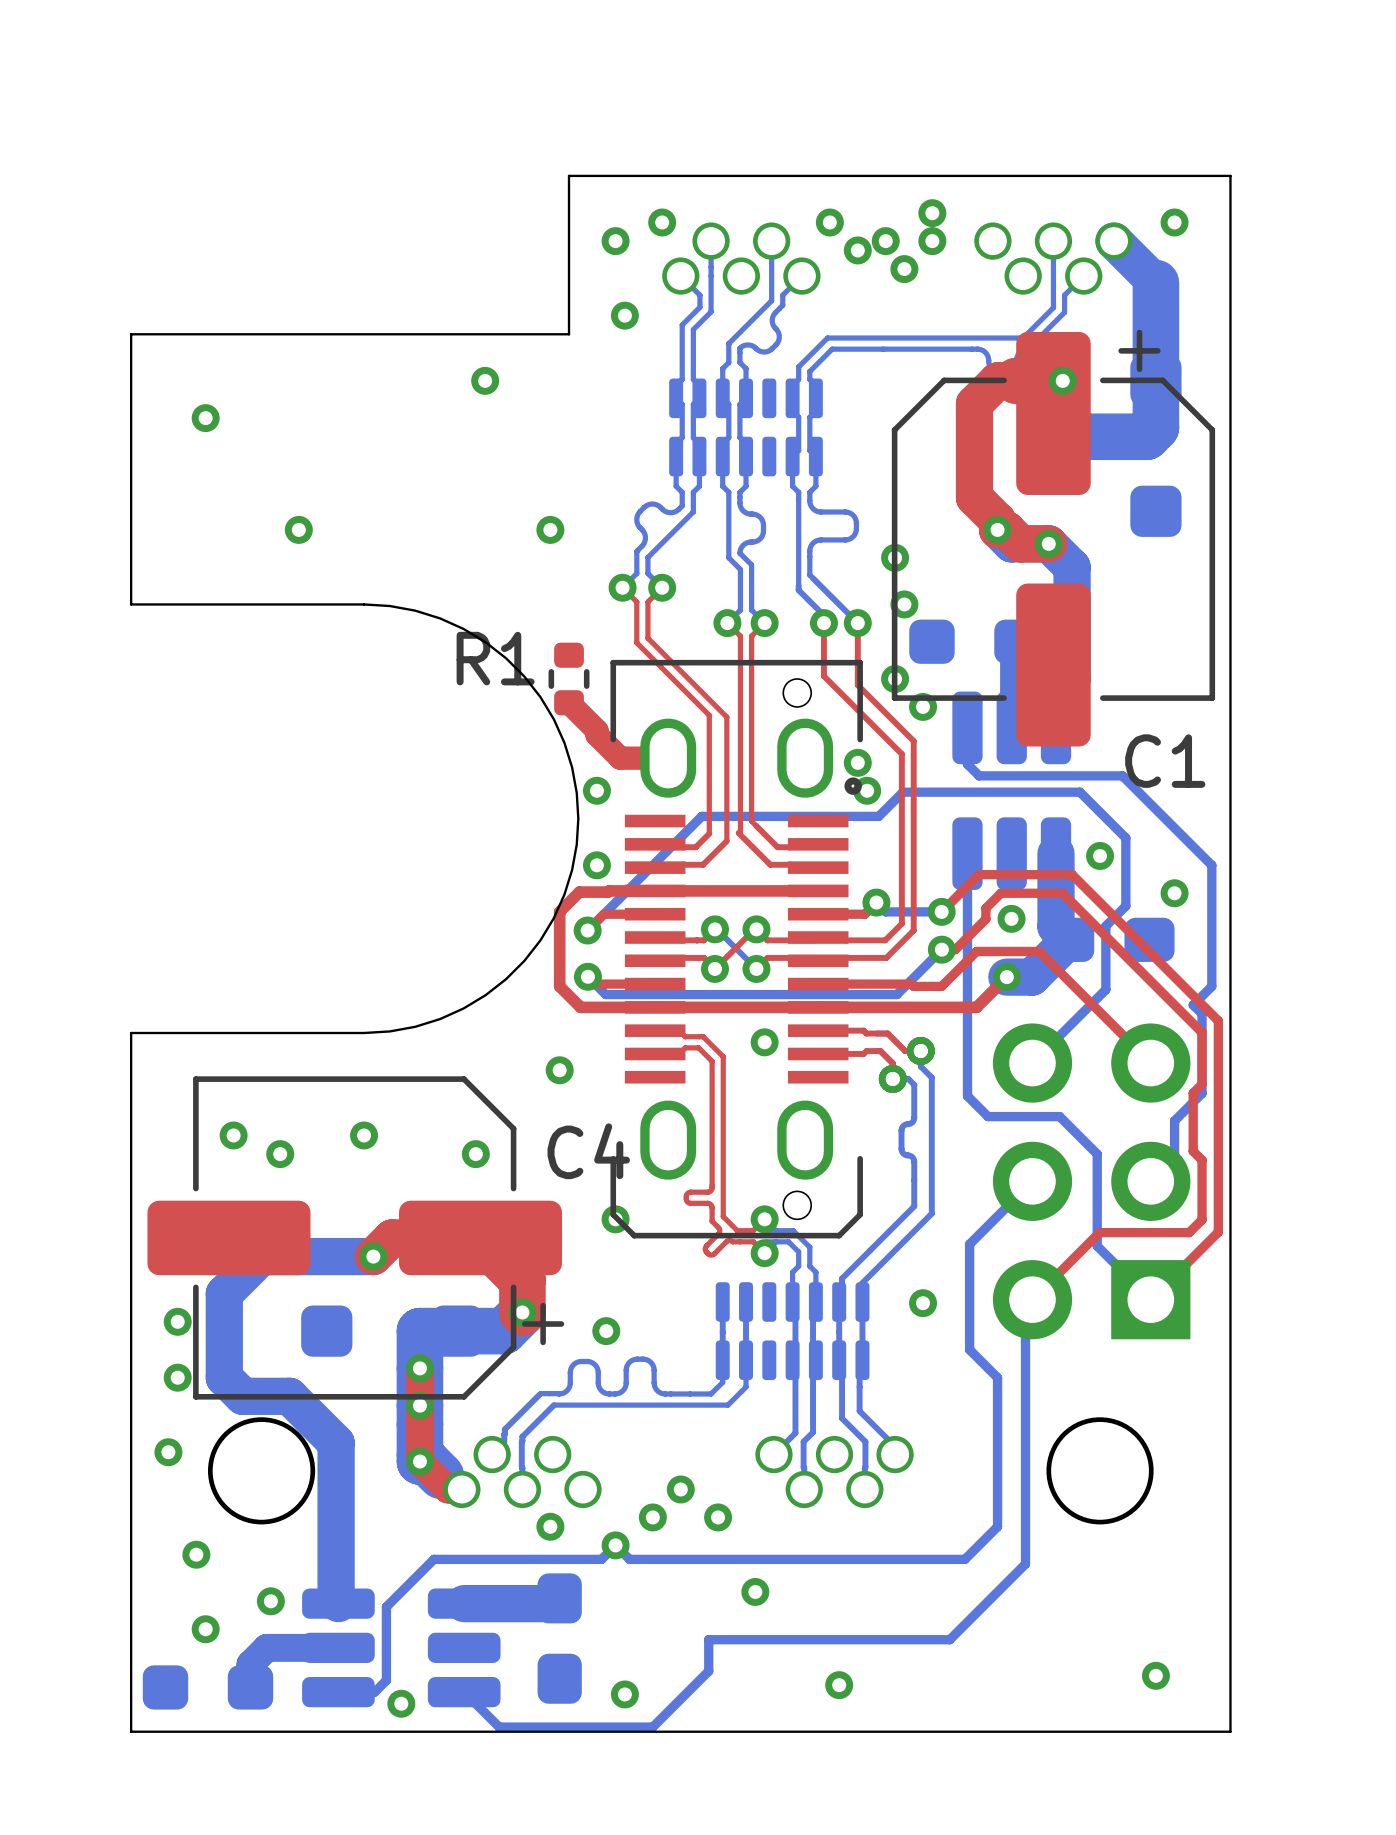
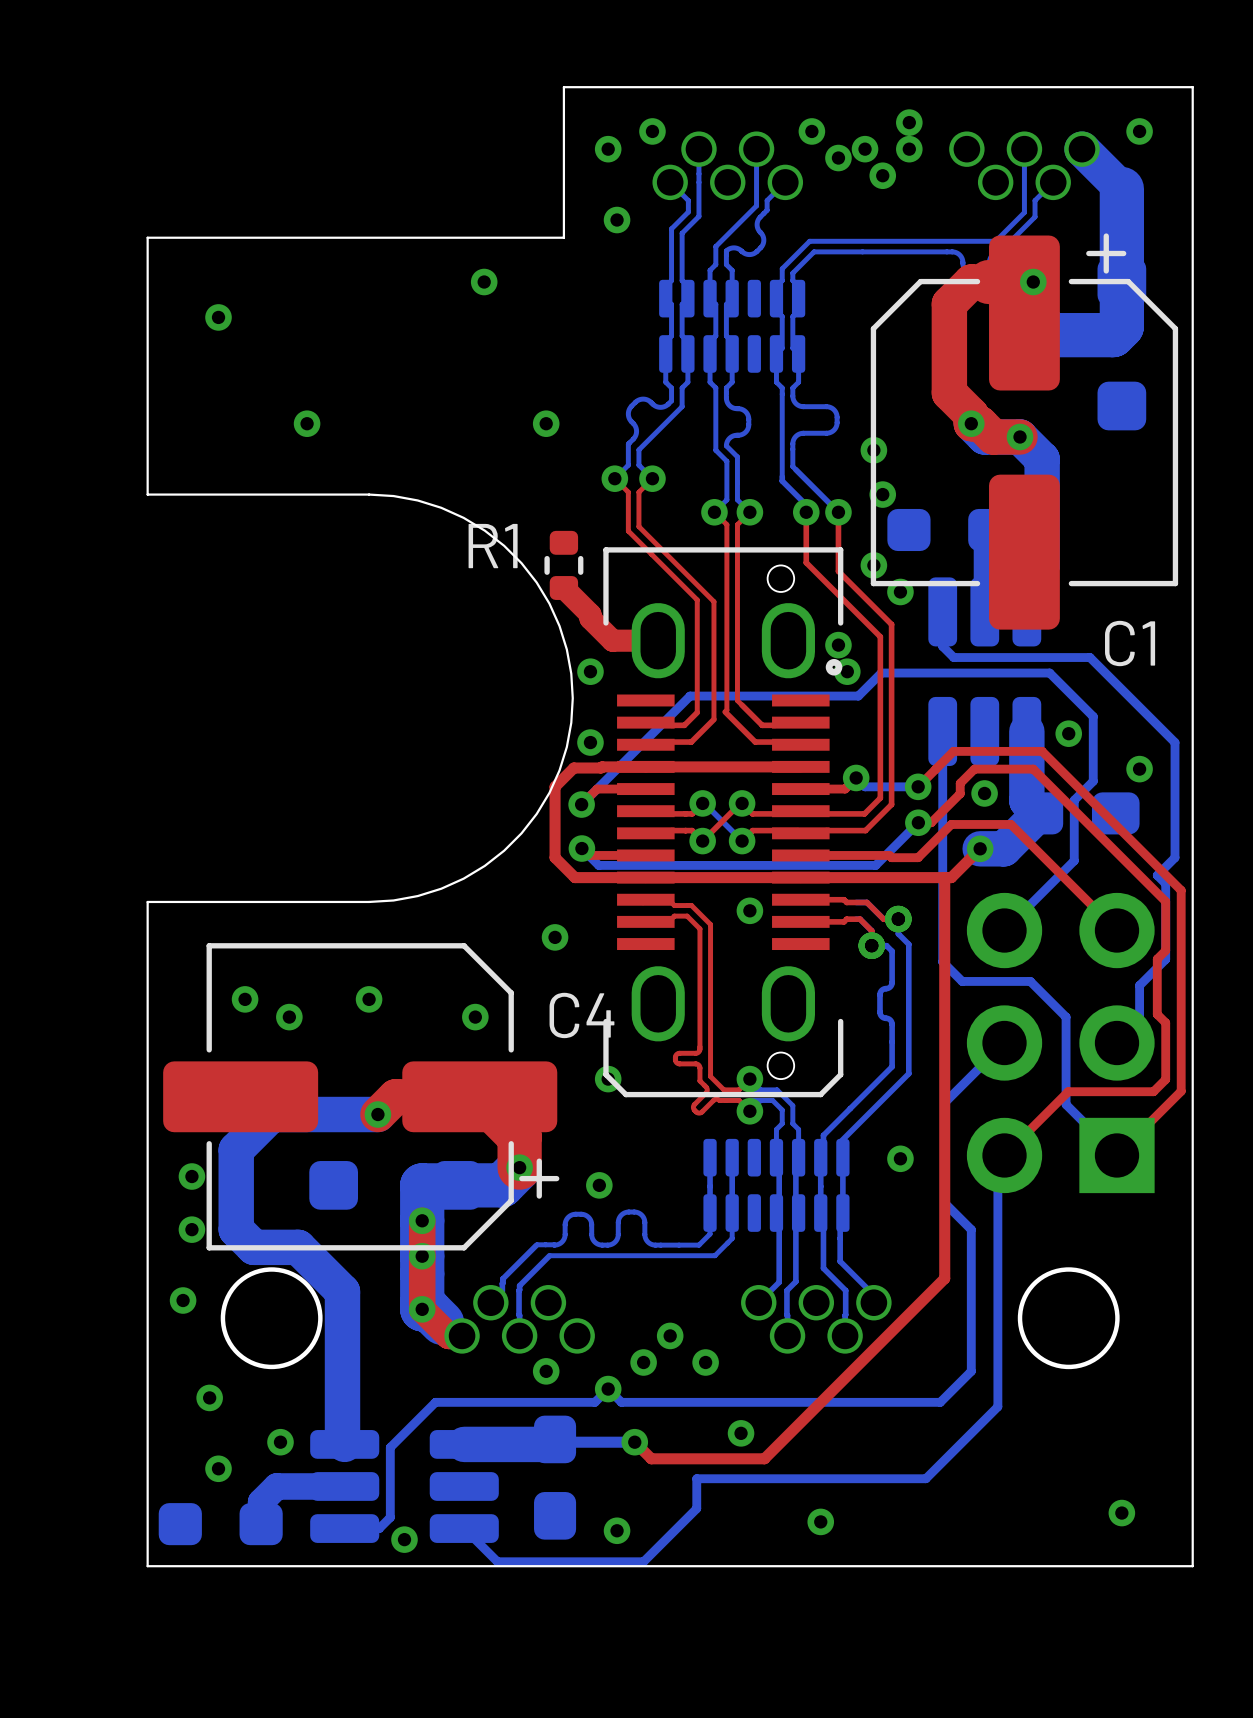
top track: none -> (944, 877) (944, 1278) (764, 1458) (651, 1458) (634, 1442)
bottom track: none -> (555, 1439) (557, 1442) (634, 1442)
via: none -> (634, 1442)

